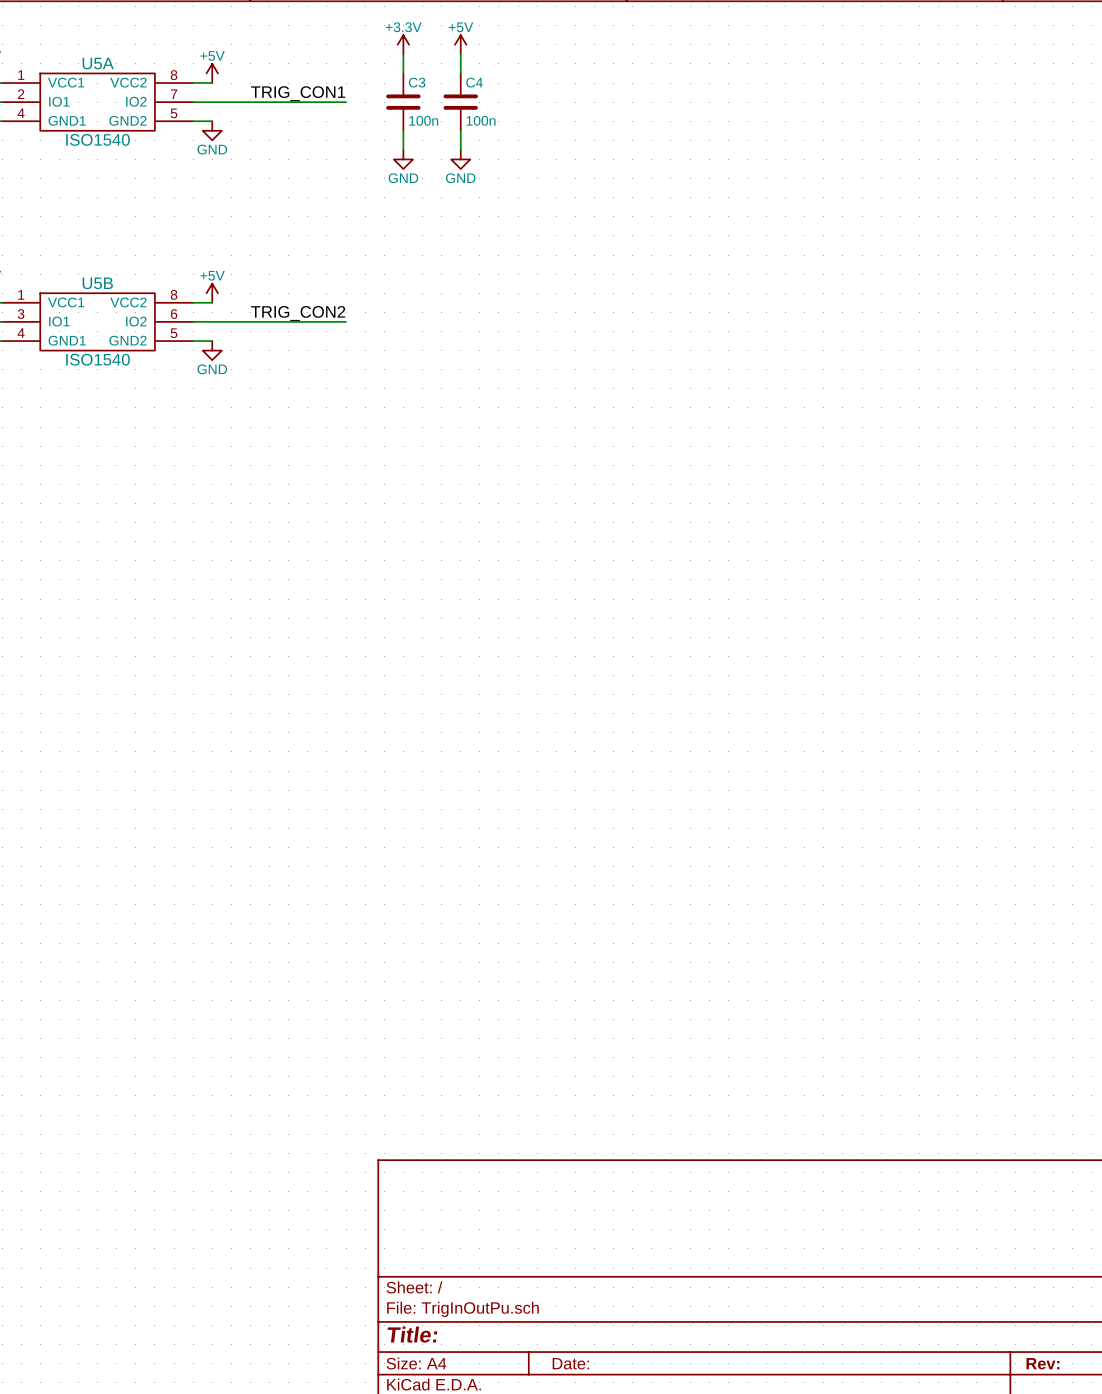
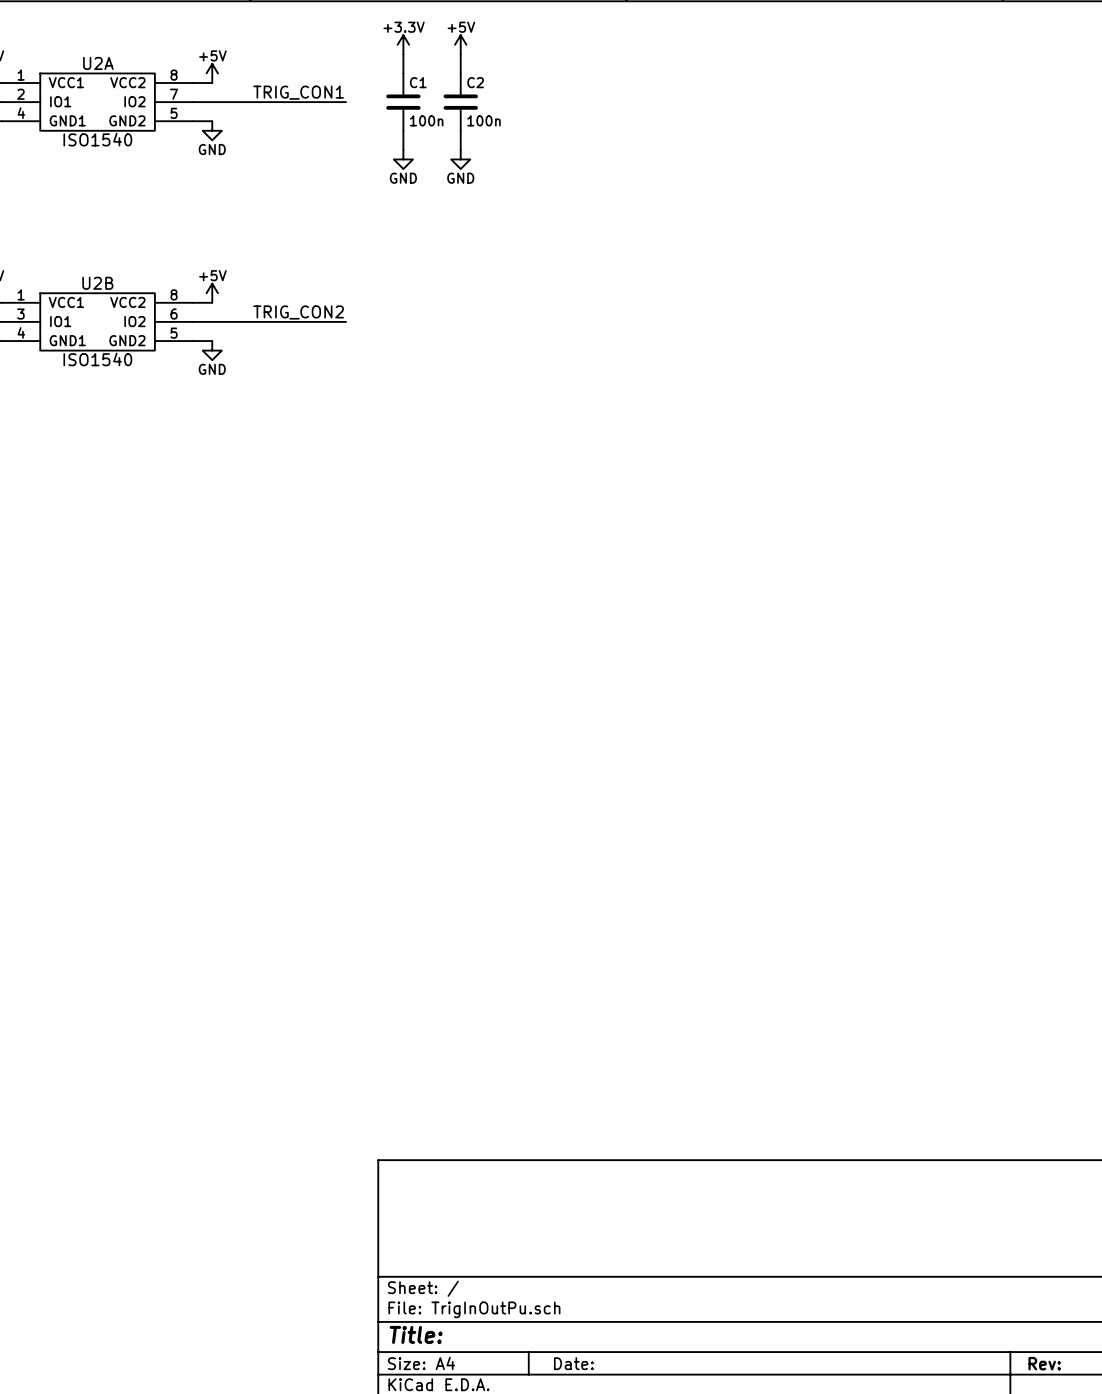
U5A name: U5A (98, 63) -> U2A (98, 63)
C3 name: C3 (417, 82) -> C1 (418, 82)
C4 name: C4 (474, 82) -> C2 (475, 82)
U5B name: U5B (97, 283) -> U2B (97, 283)

